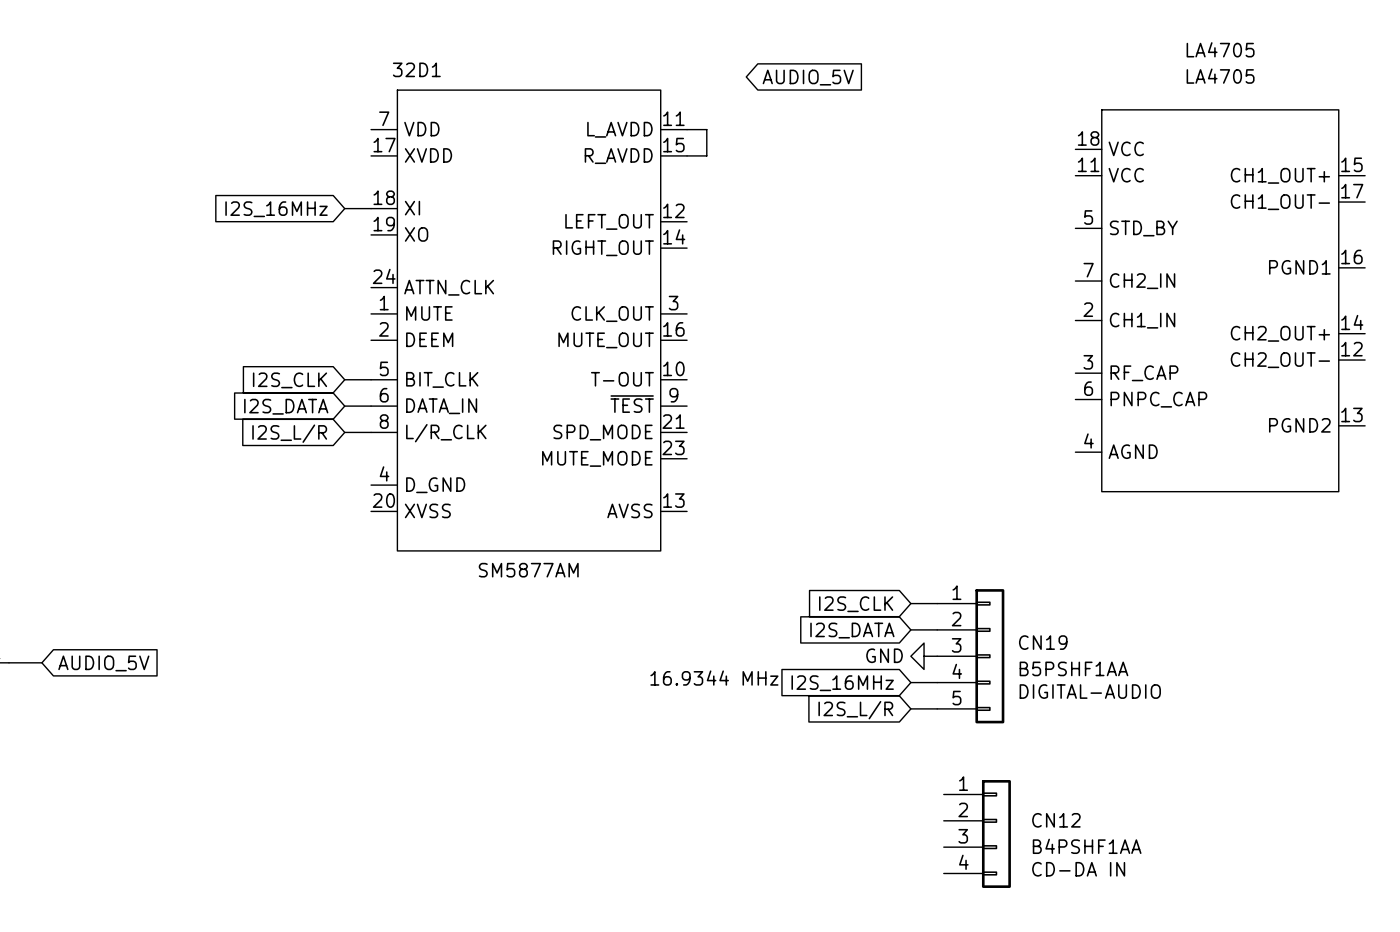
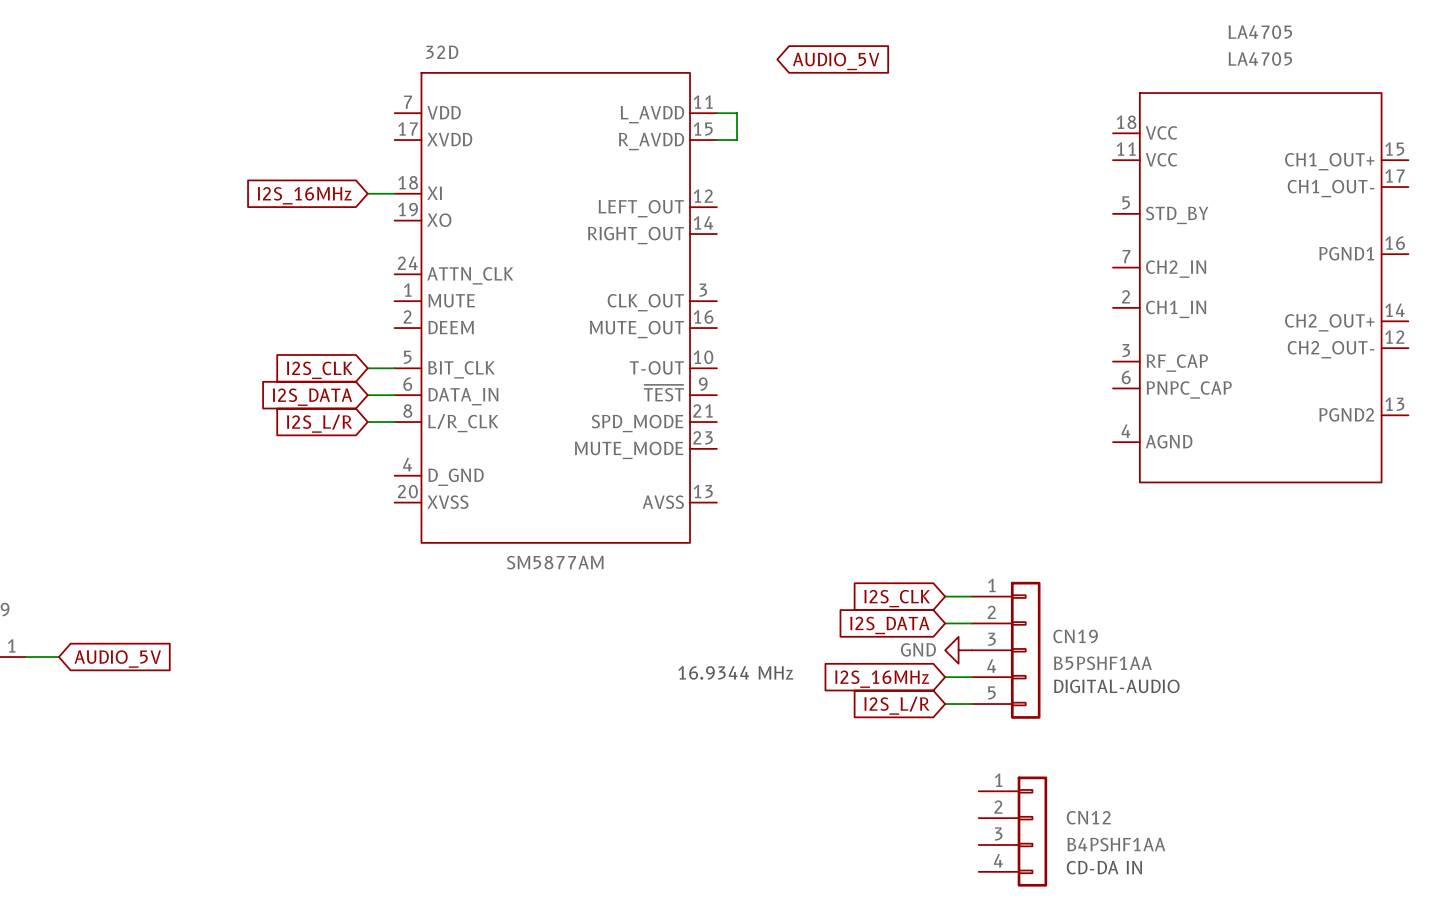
32D1 name: 32D1 (416, 69) -> 32D (442, 52)

